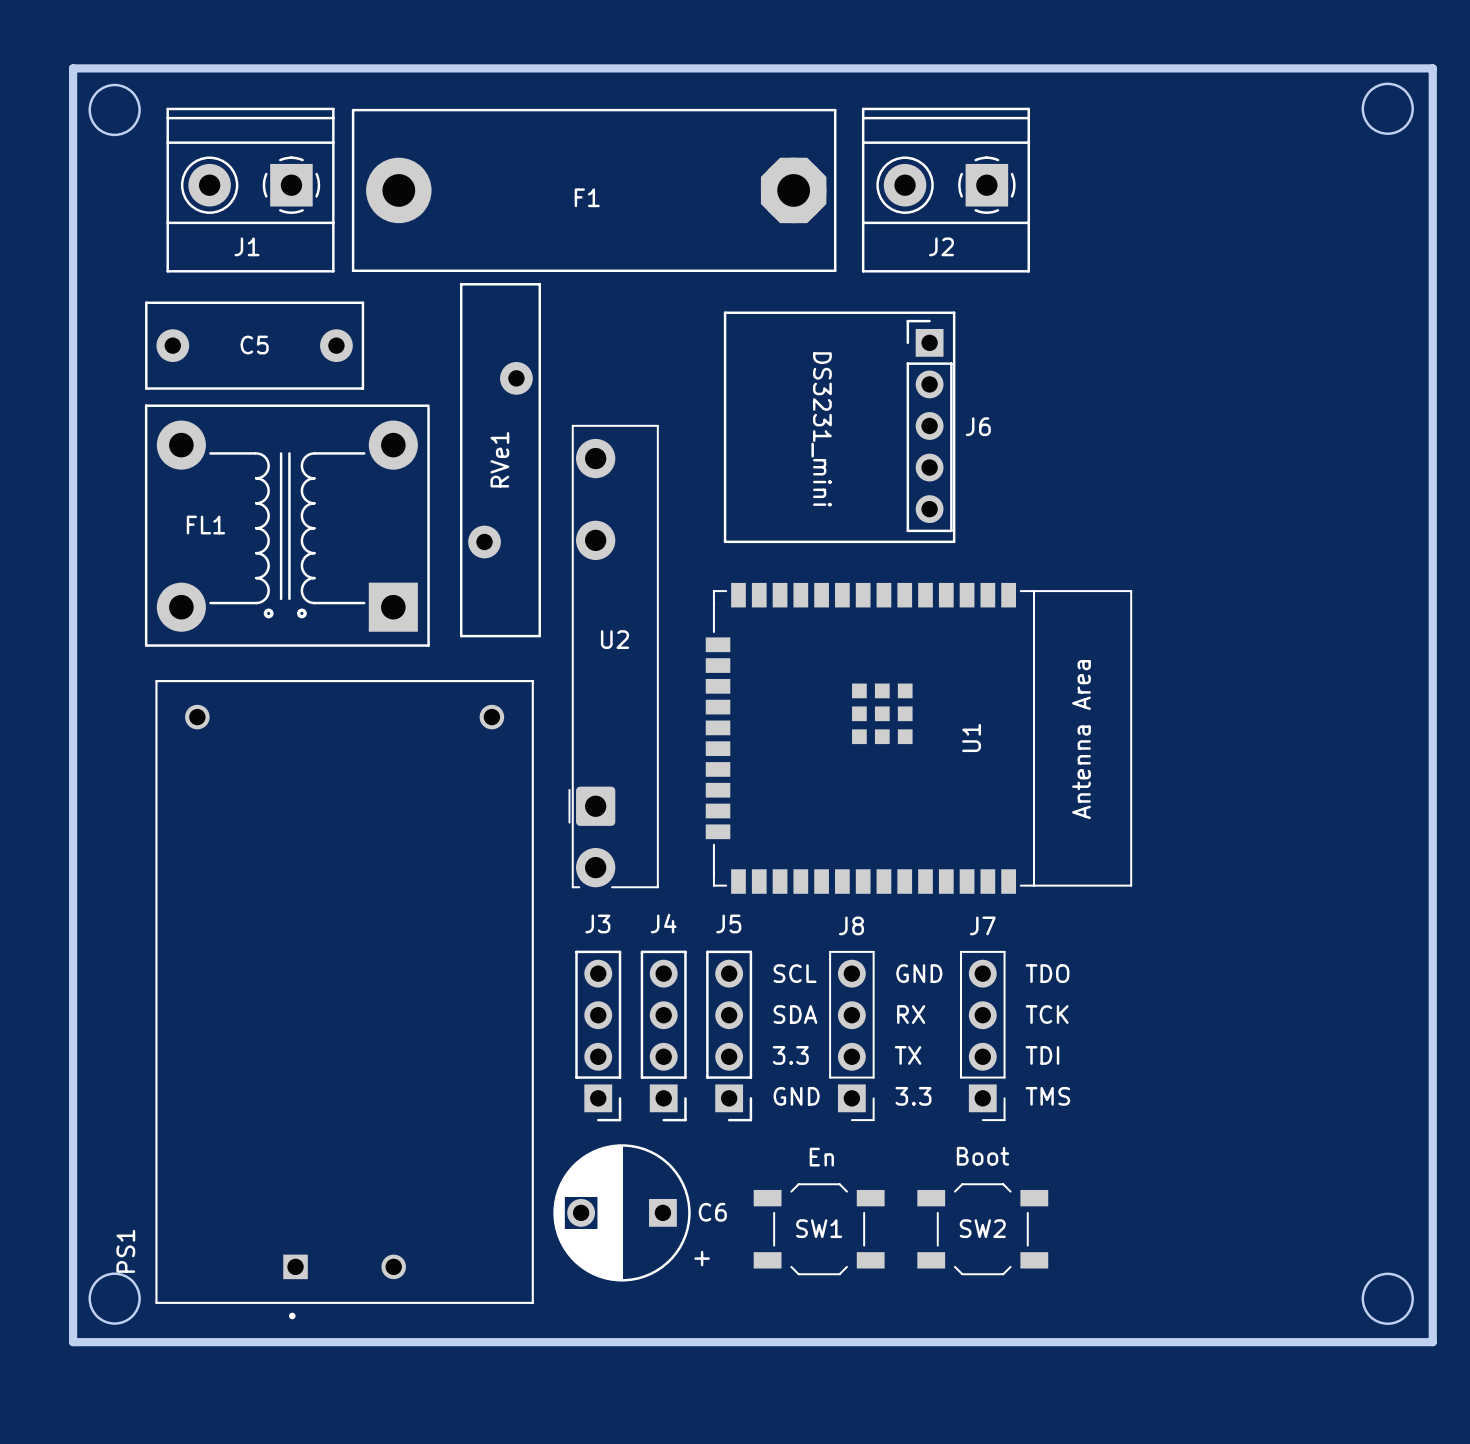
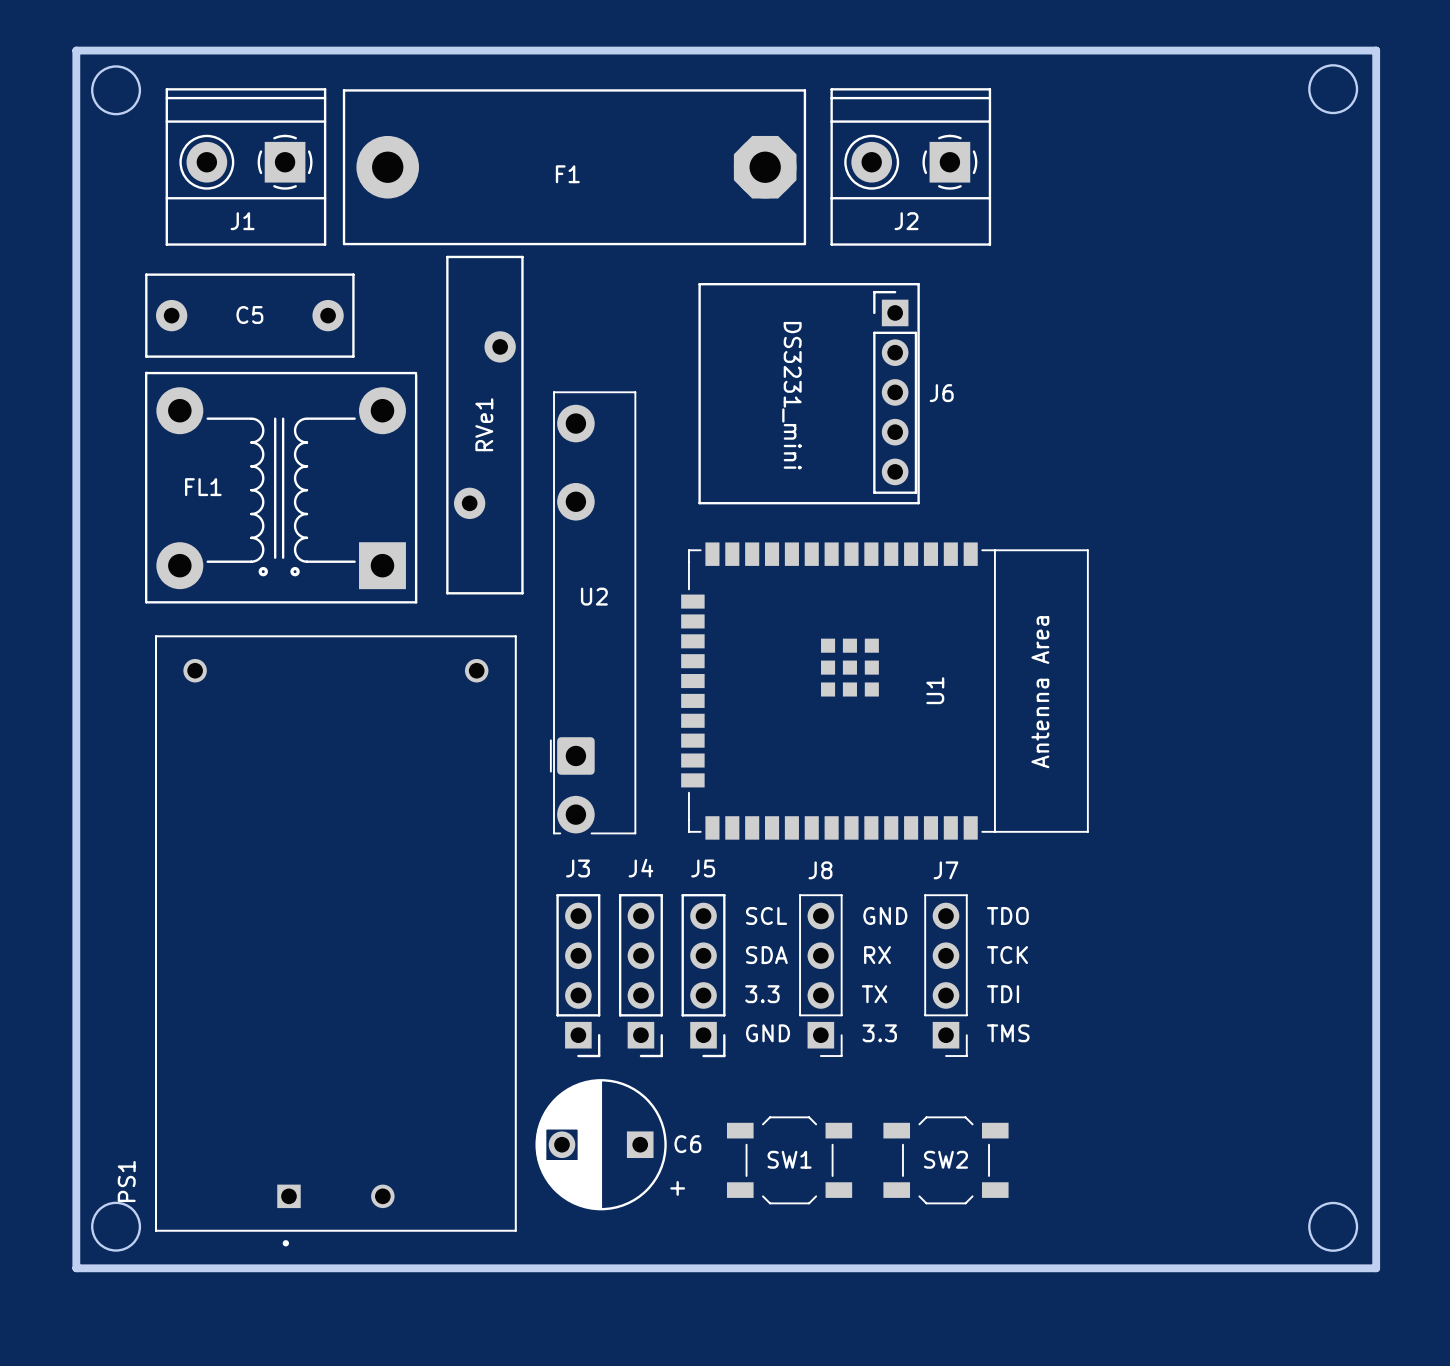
text: Boot (982, 1156) -> none
text: En (821, 1157) -> none

